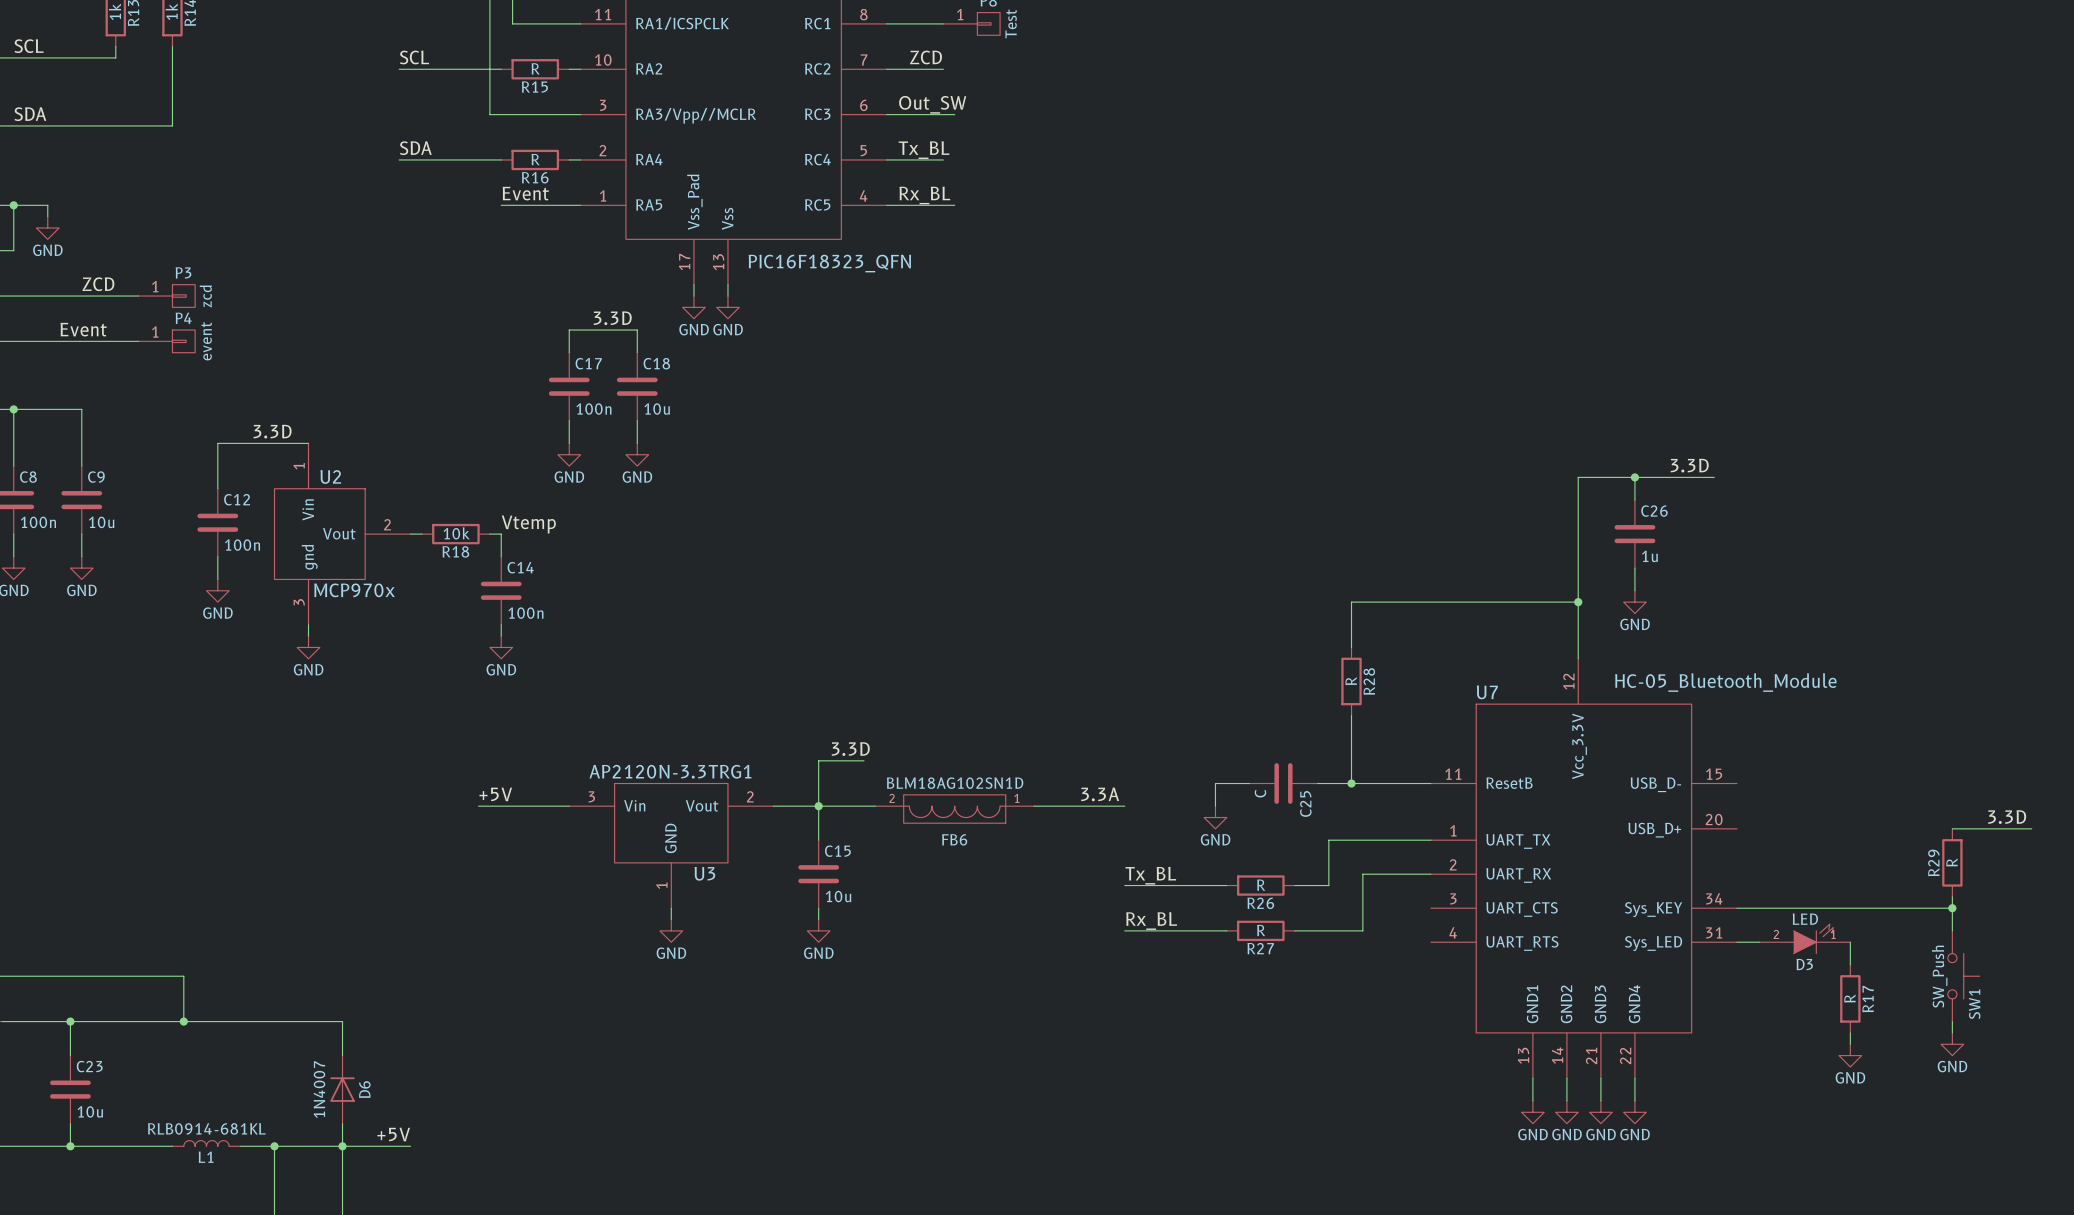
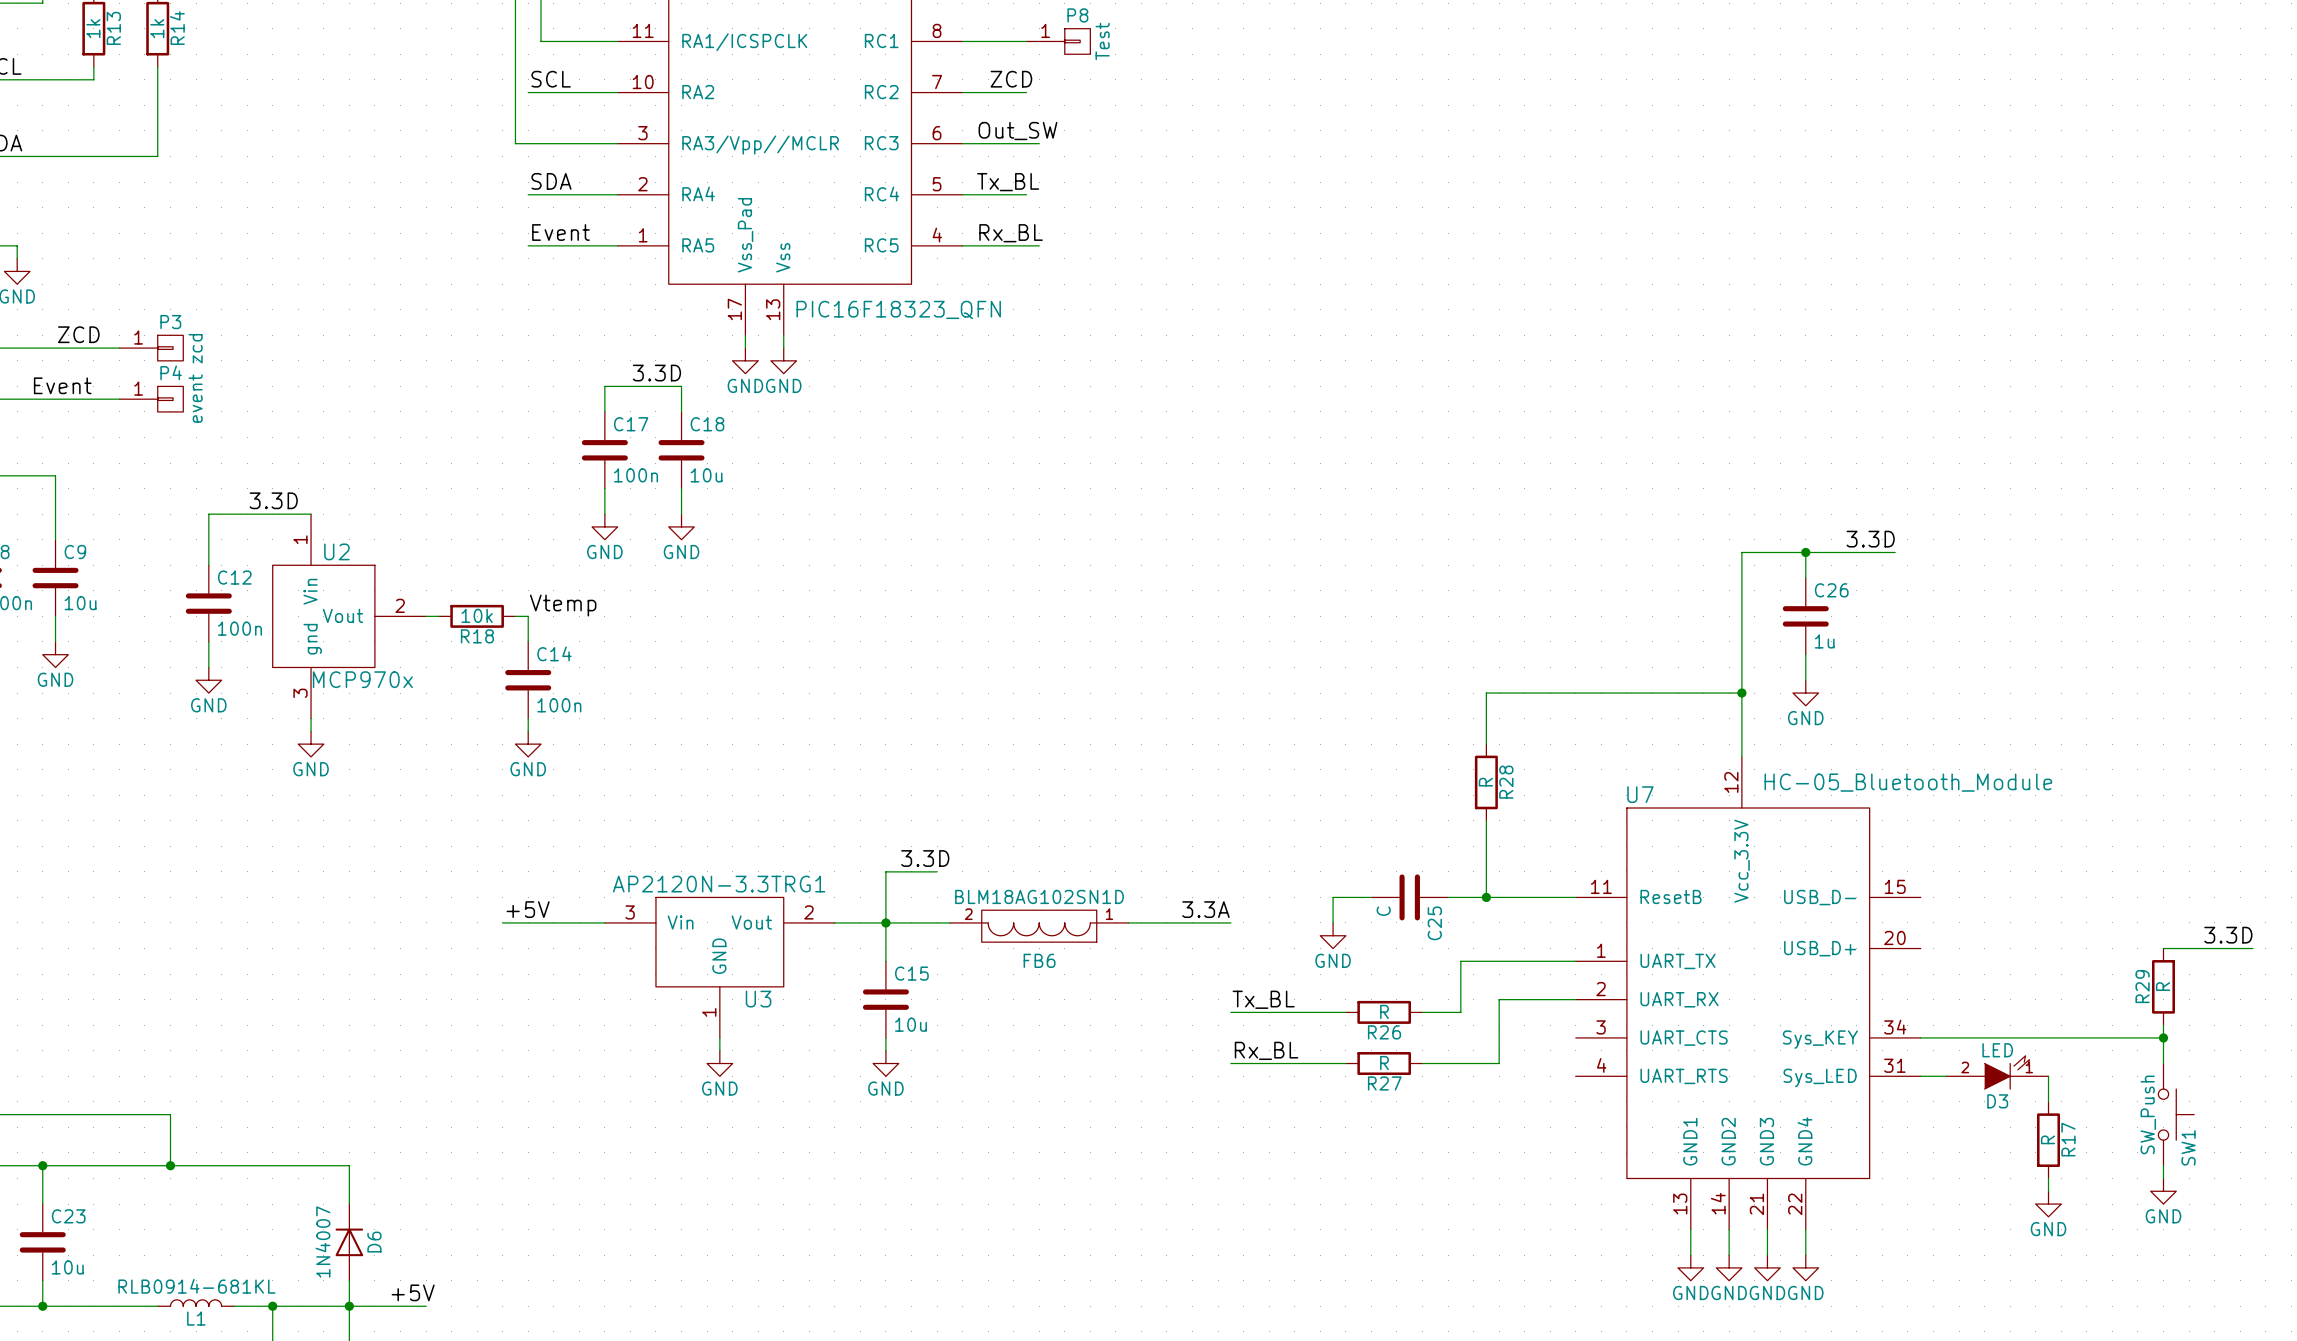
label position: SCL (414, 57) -> SCL (551, 79)
wire: (399, 69) (501, 69) -> (604, 92) (528, 92)
R15: R (535, 69) -> none
label position: SDA (415, 148) -> SDA (551, 181)
wire: (399, 159) (501, 159) -> (604, 194) (528, 194)
R16: R (535, 159) -> none

